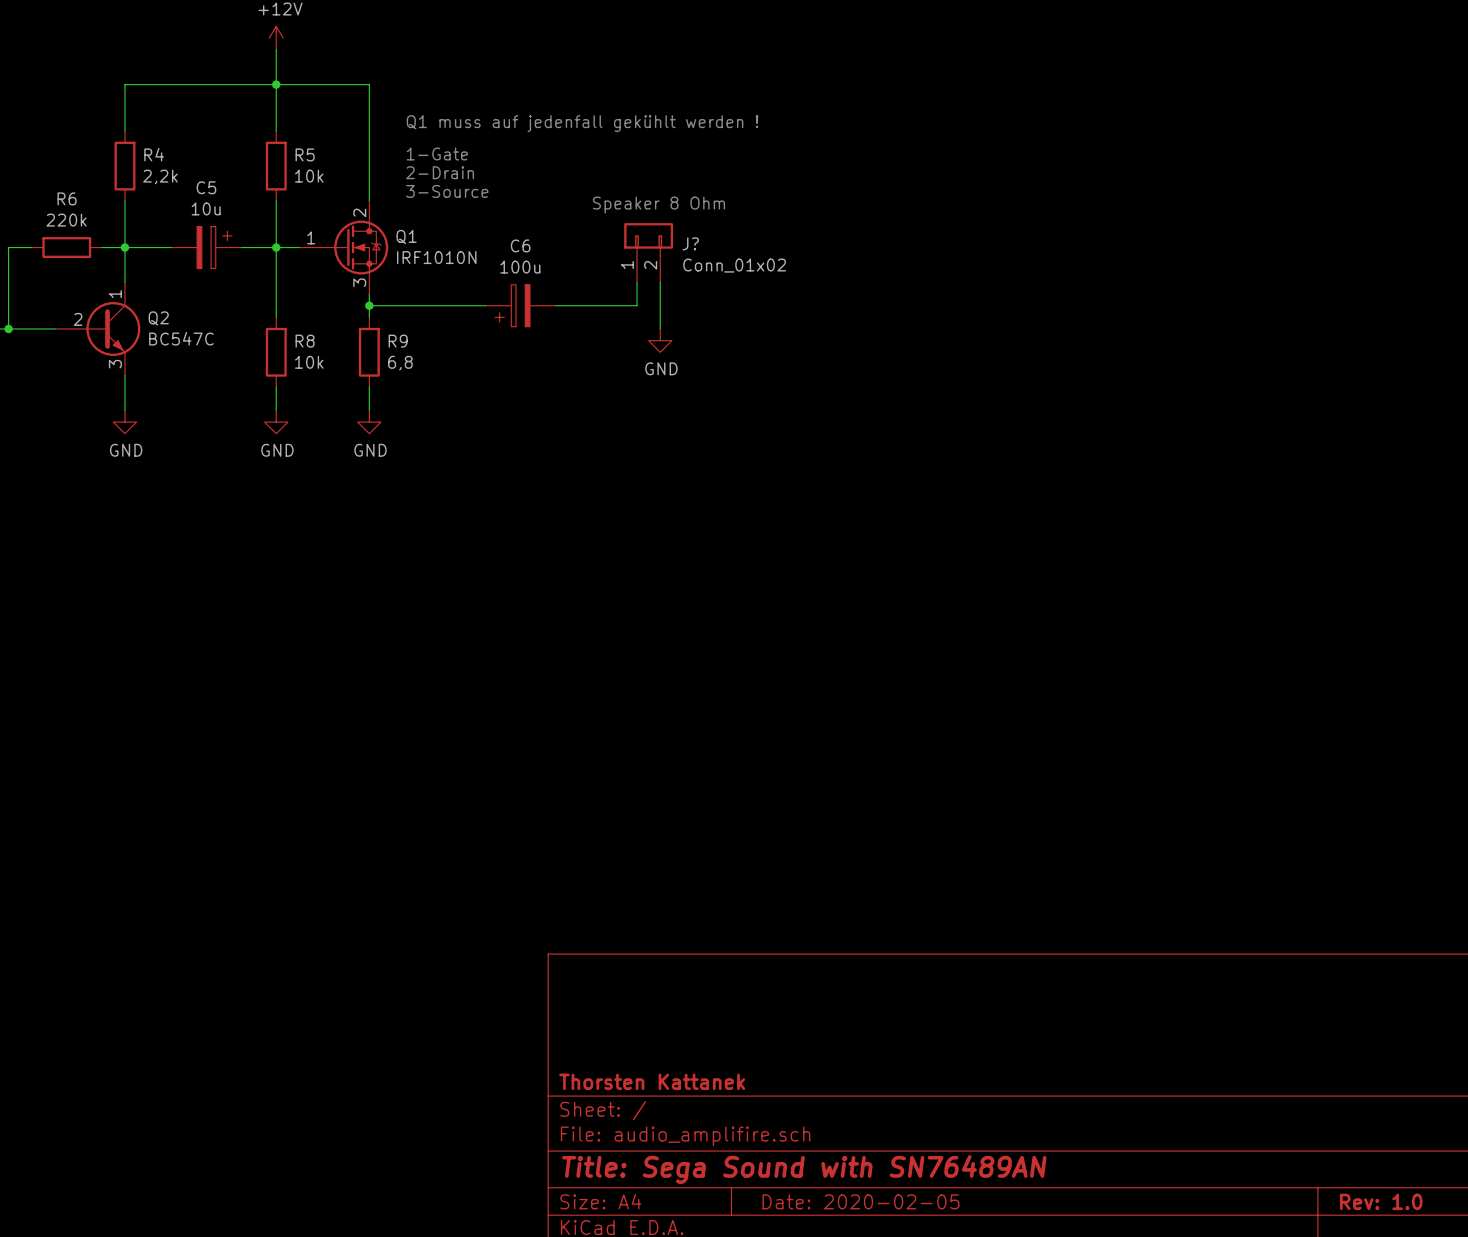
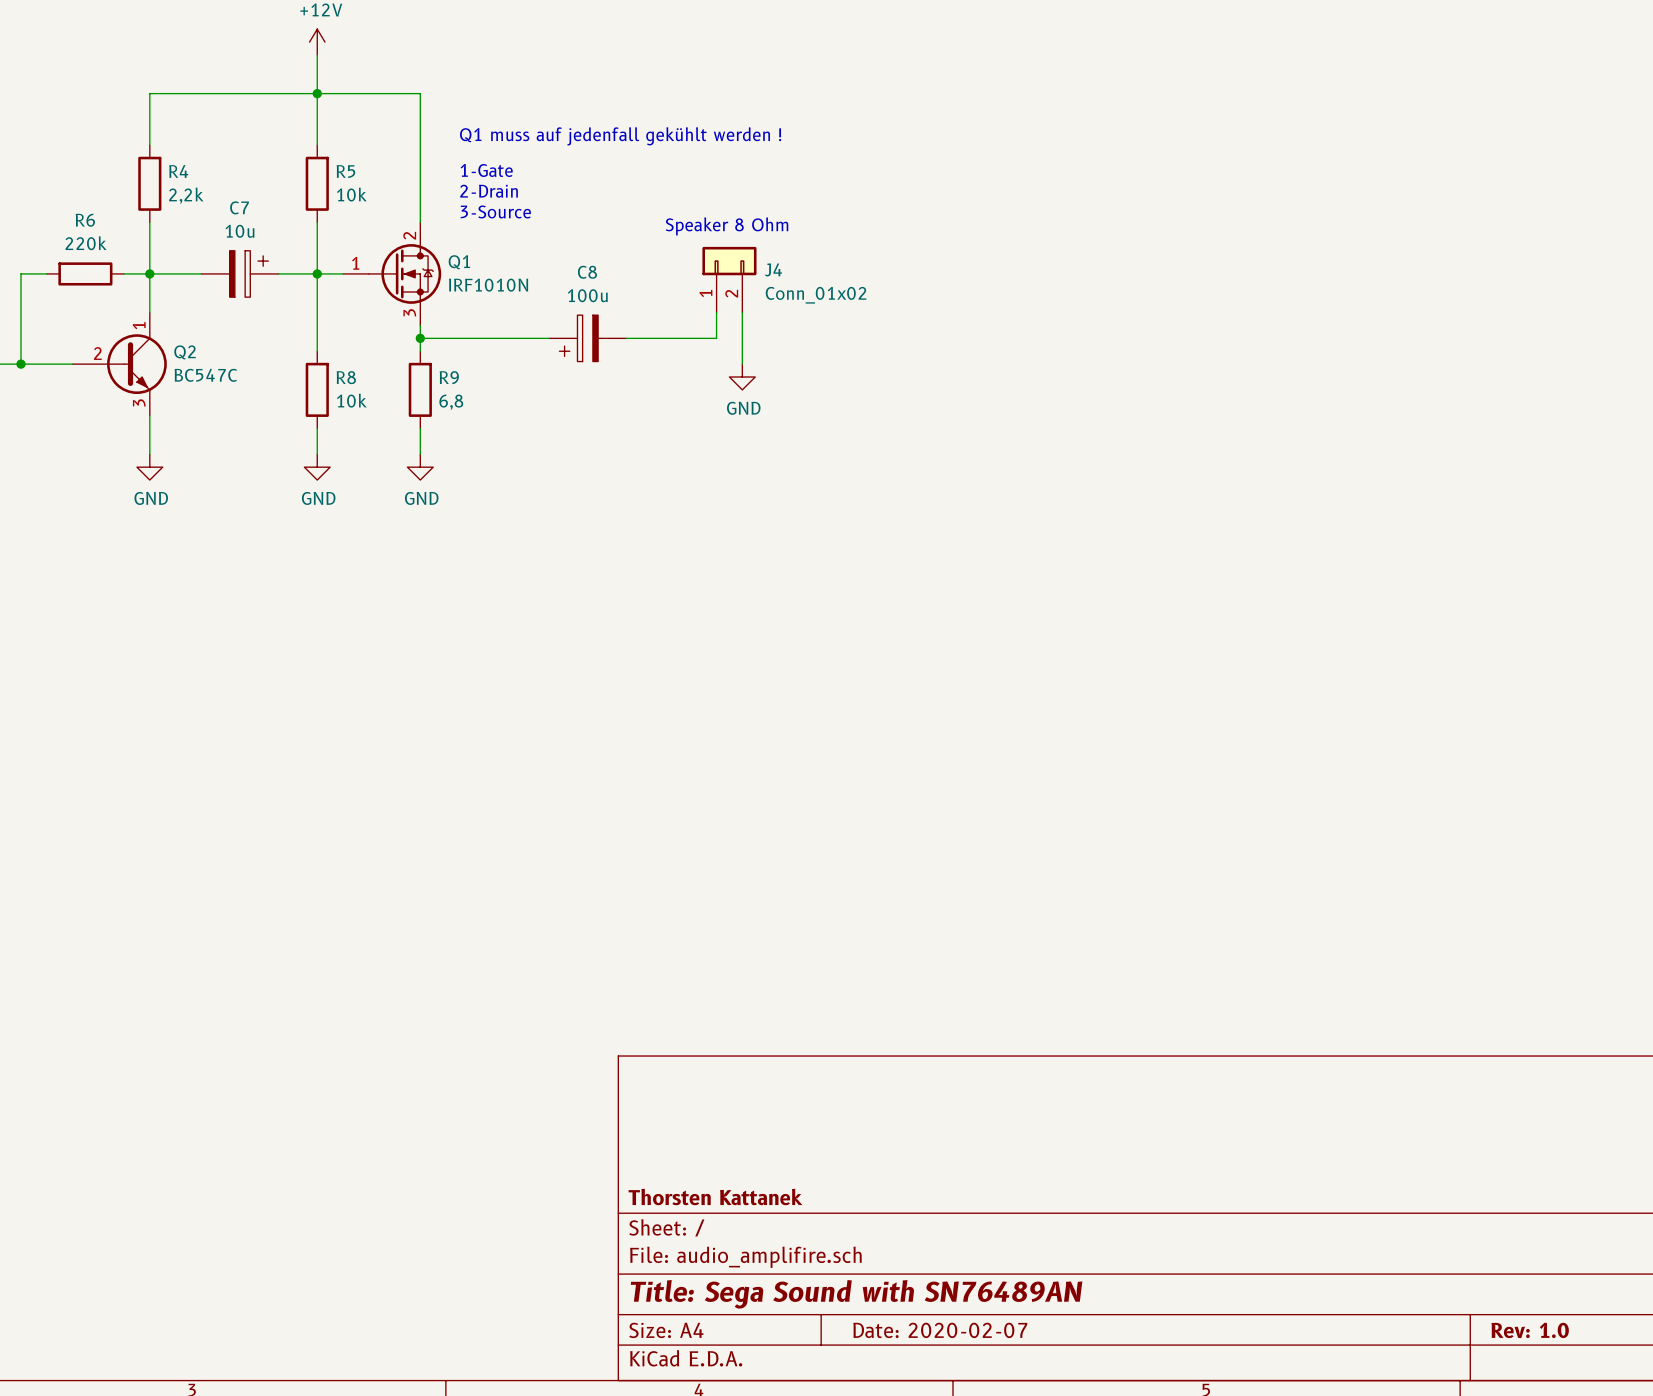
C5 name: C5 (206, 187) -> C7 (239, 207)
J? name: J? (690, 243) -> J4 (773, 269)
C6 name: C6 (520, 245) -> C8 (587, 272)
title block: Date: 2020-02-05 (861, 1201) -> Date: 2020-02-07 (940, 1330)

